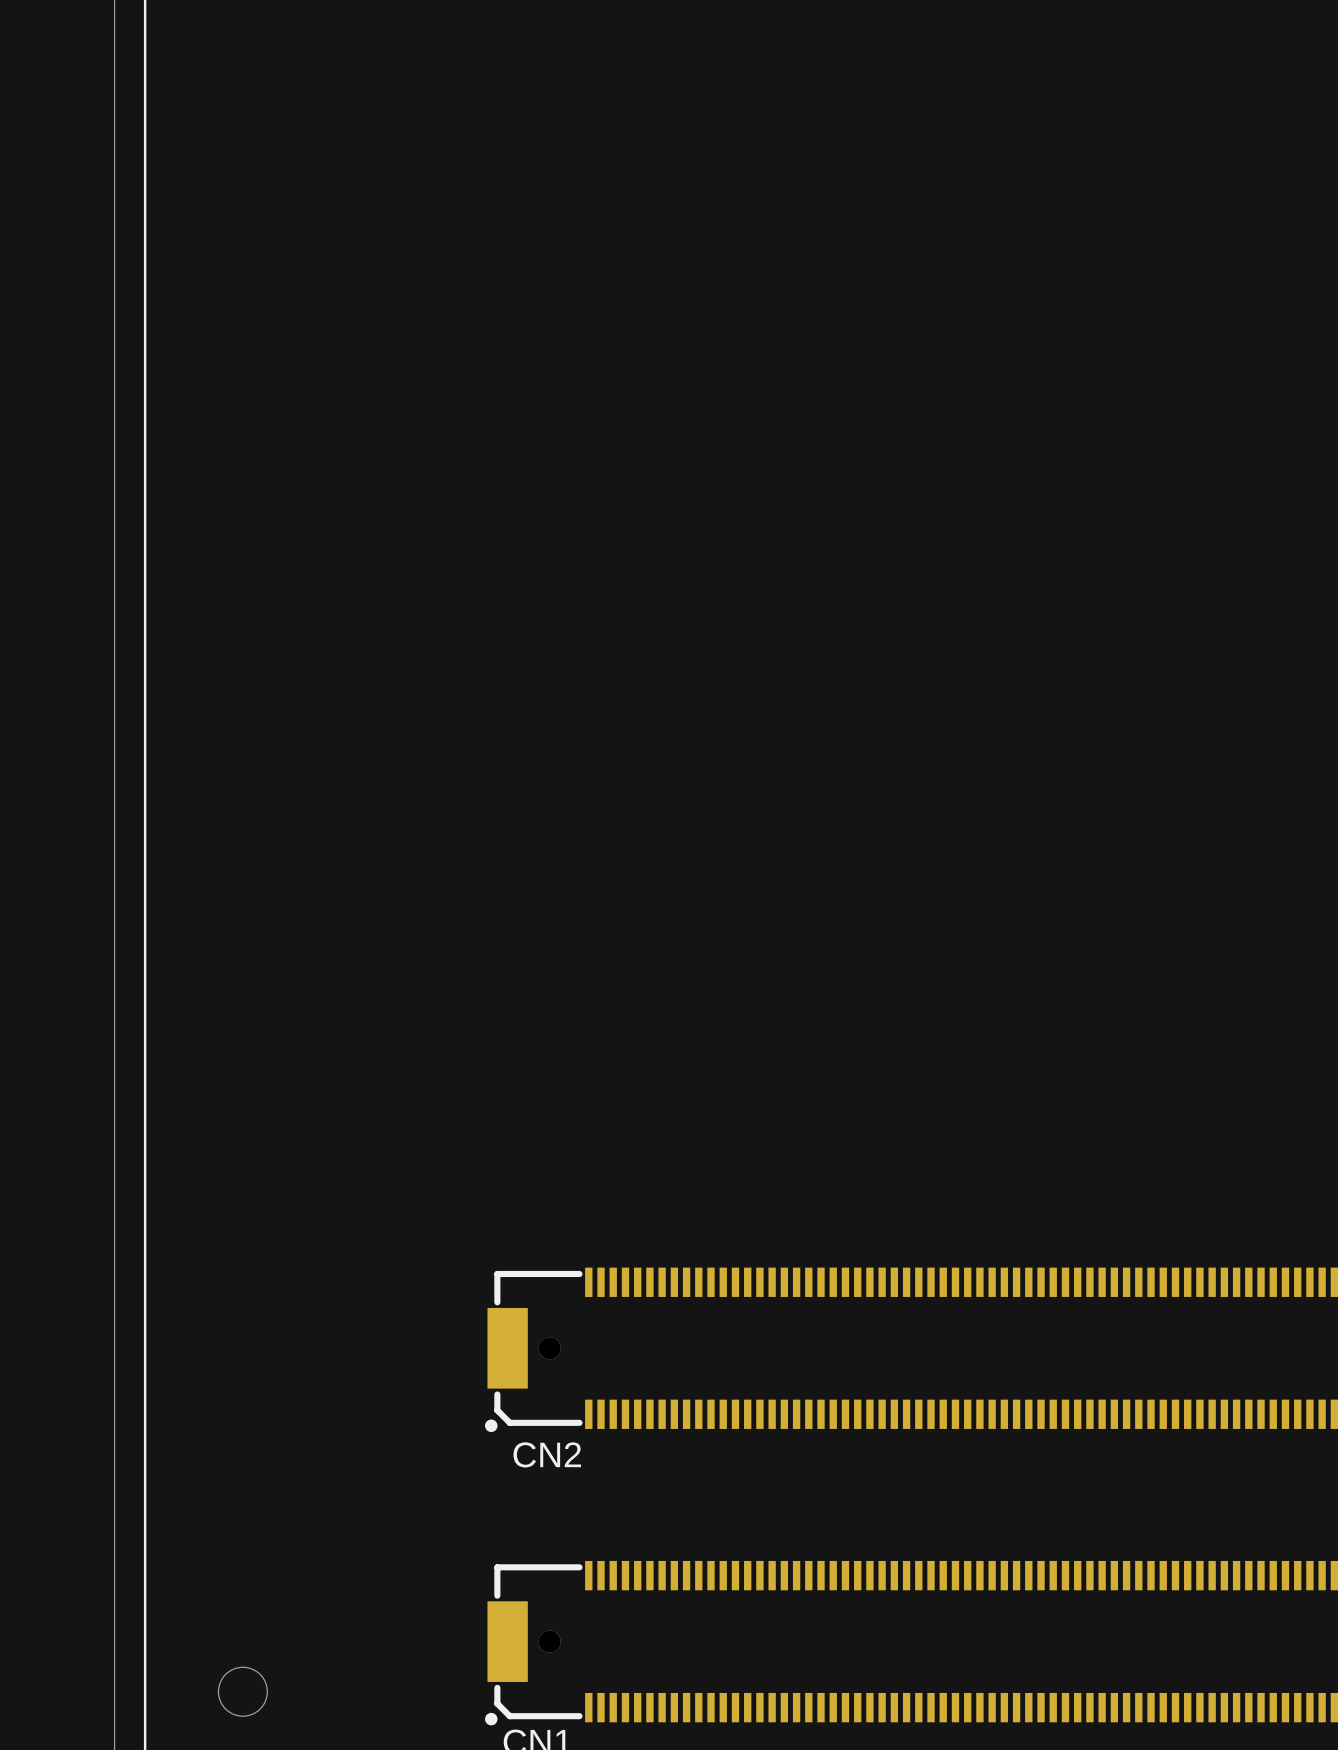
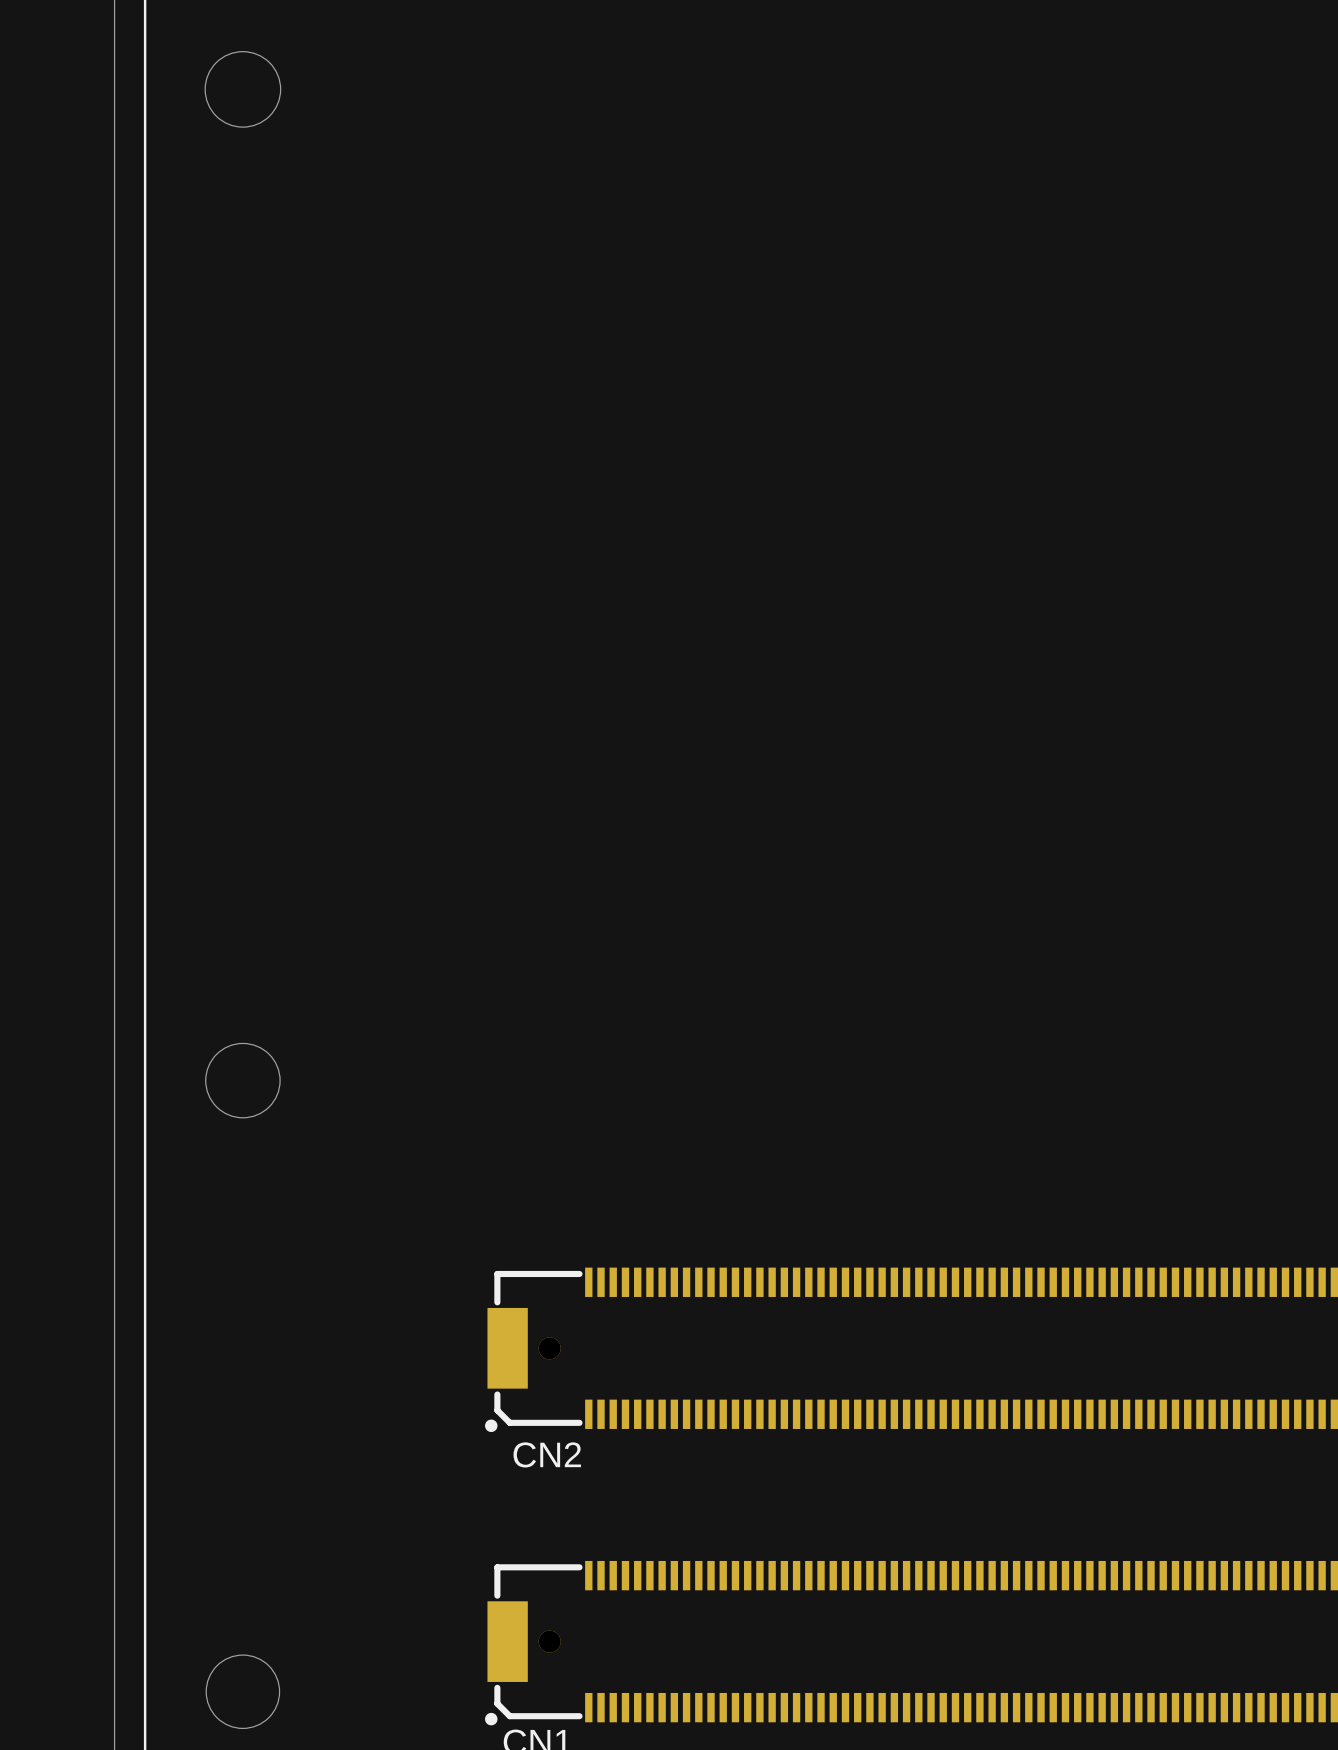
round board edge: none -> [204, 51, 282, 128]
round board edge: none -> [205, 1042, 281, 1119]
round board edge size: [217, 1666, 268, 1717] -> [205, 1654, 281, 1730]

